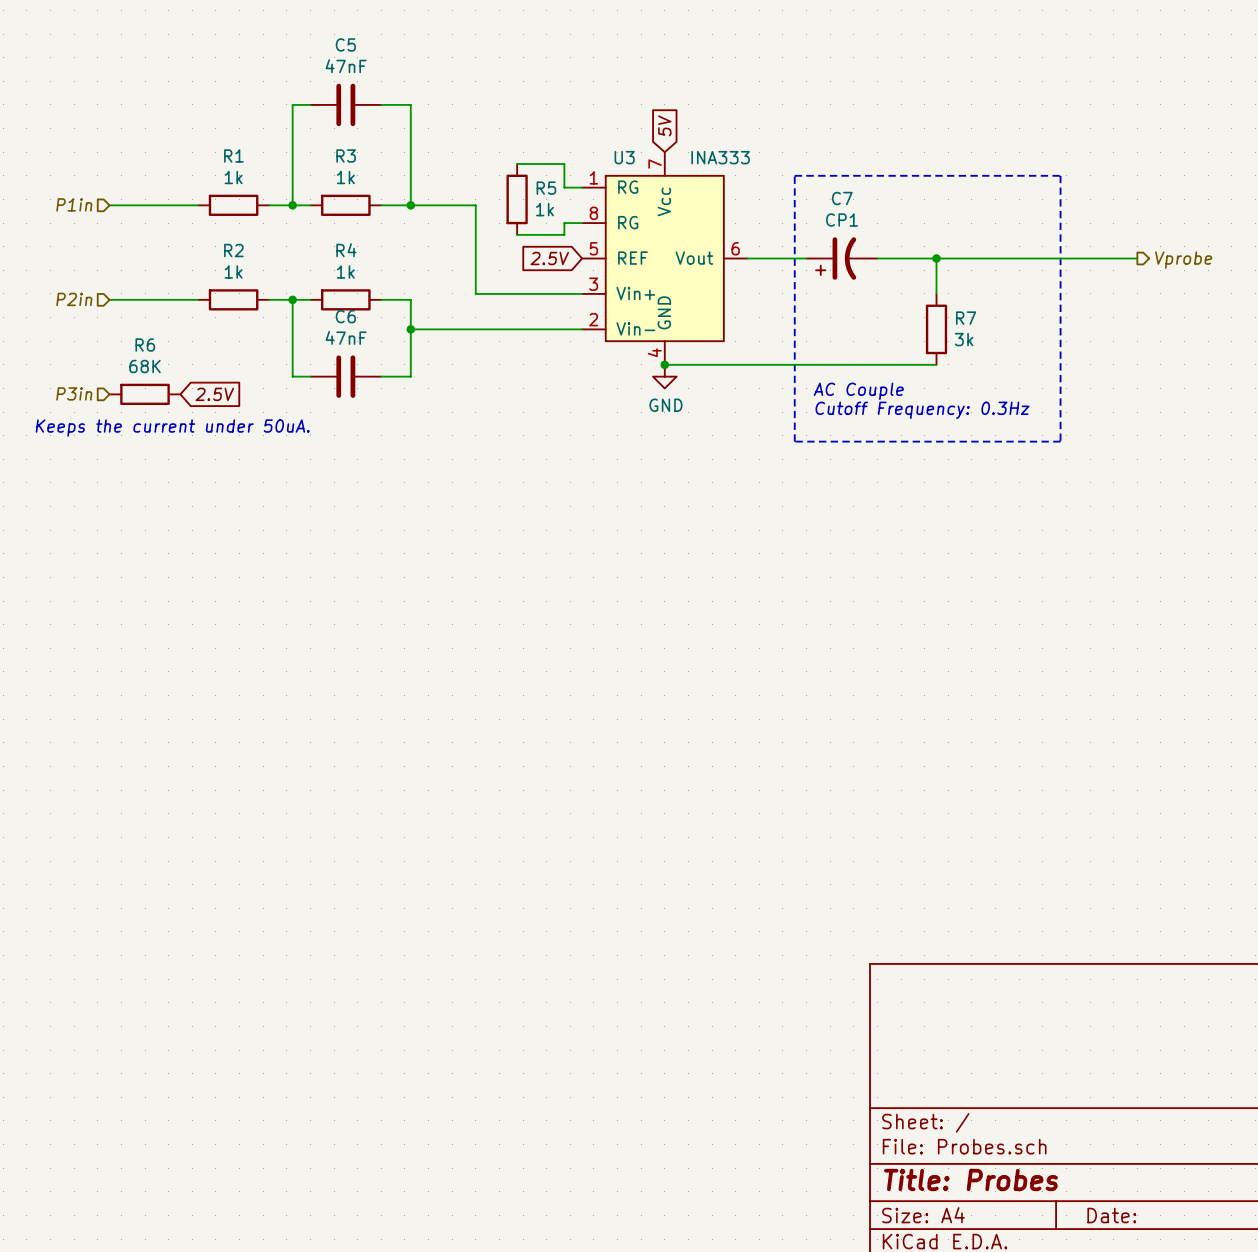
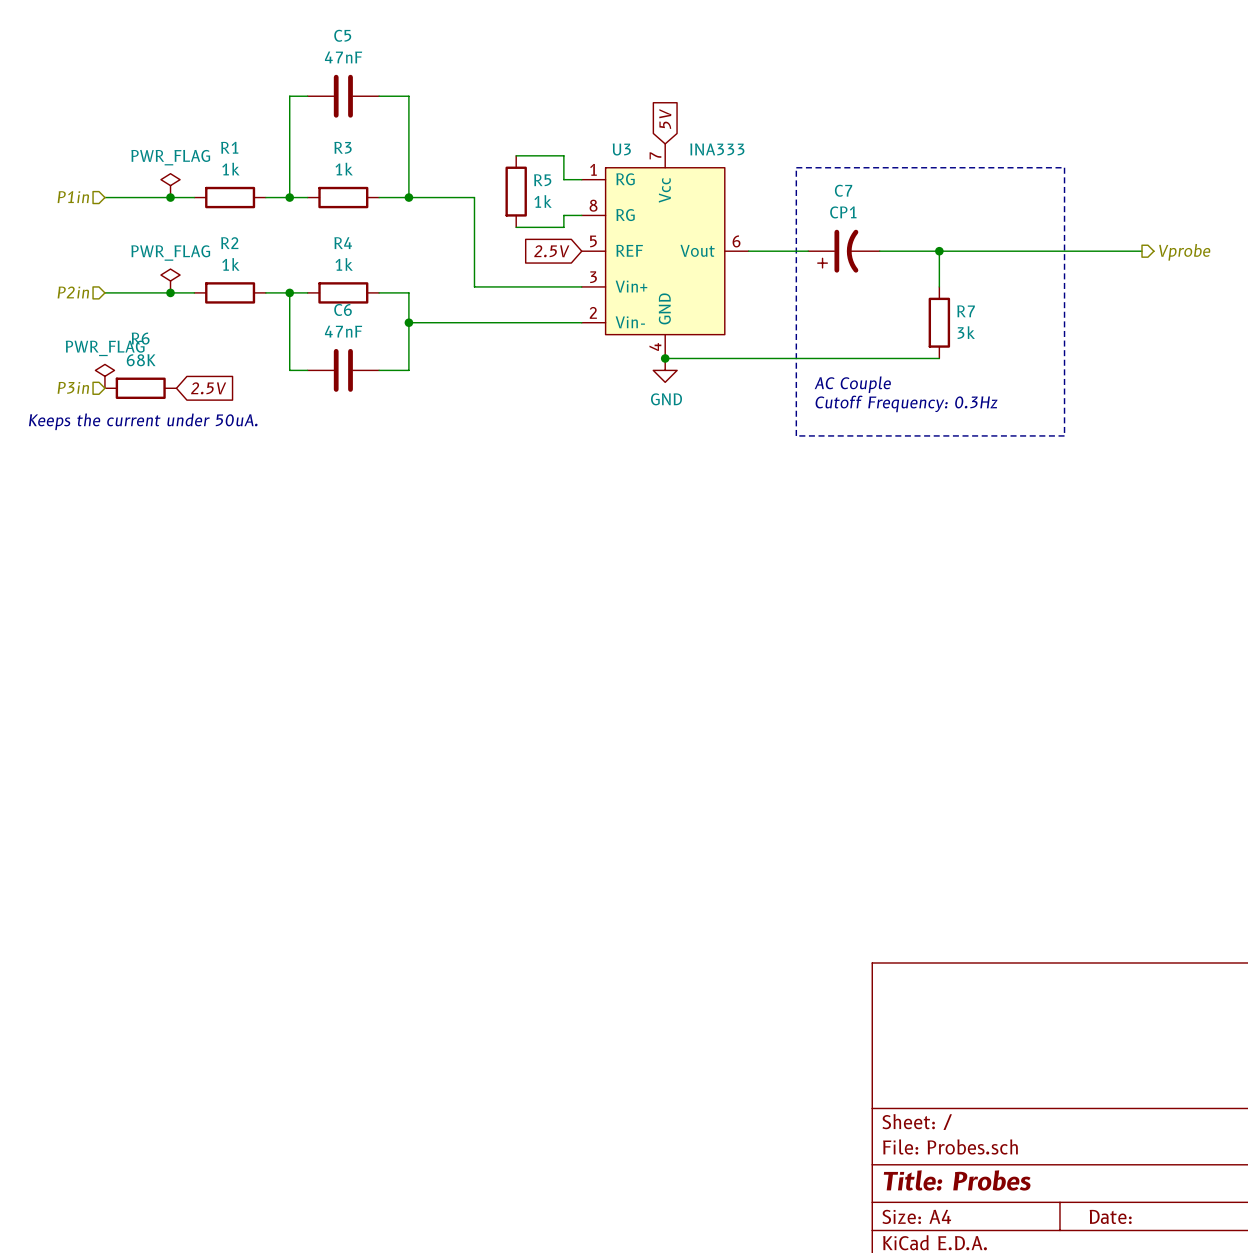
power symbol: none -> PWR_FLAG (170, 185)
junction: none -> (170, 197)
power symbol: none -> PWR_FLAG (170, 280)
junction: none -> (170, 292)
power symbol: none -> PWR_FLAG (104, 376)

